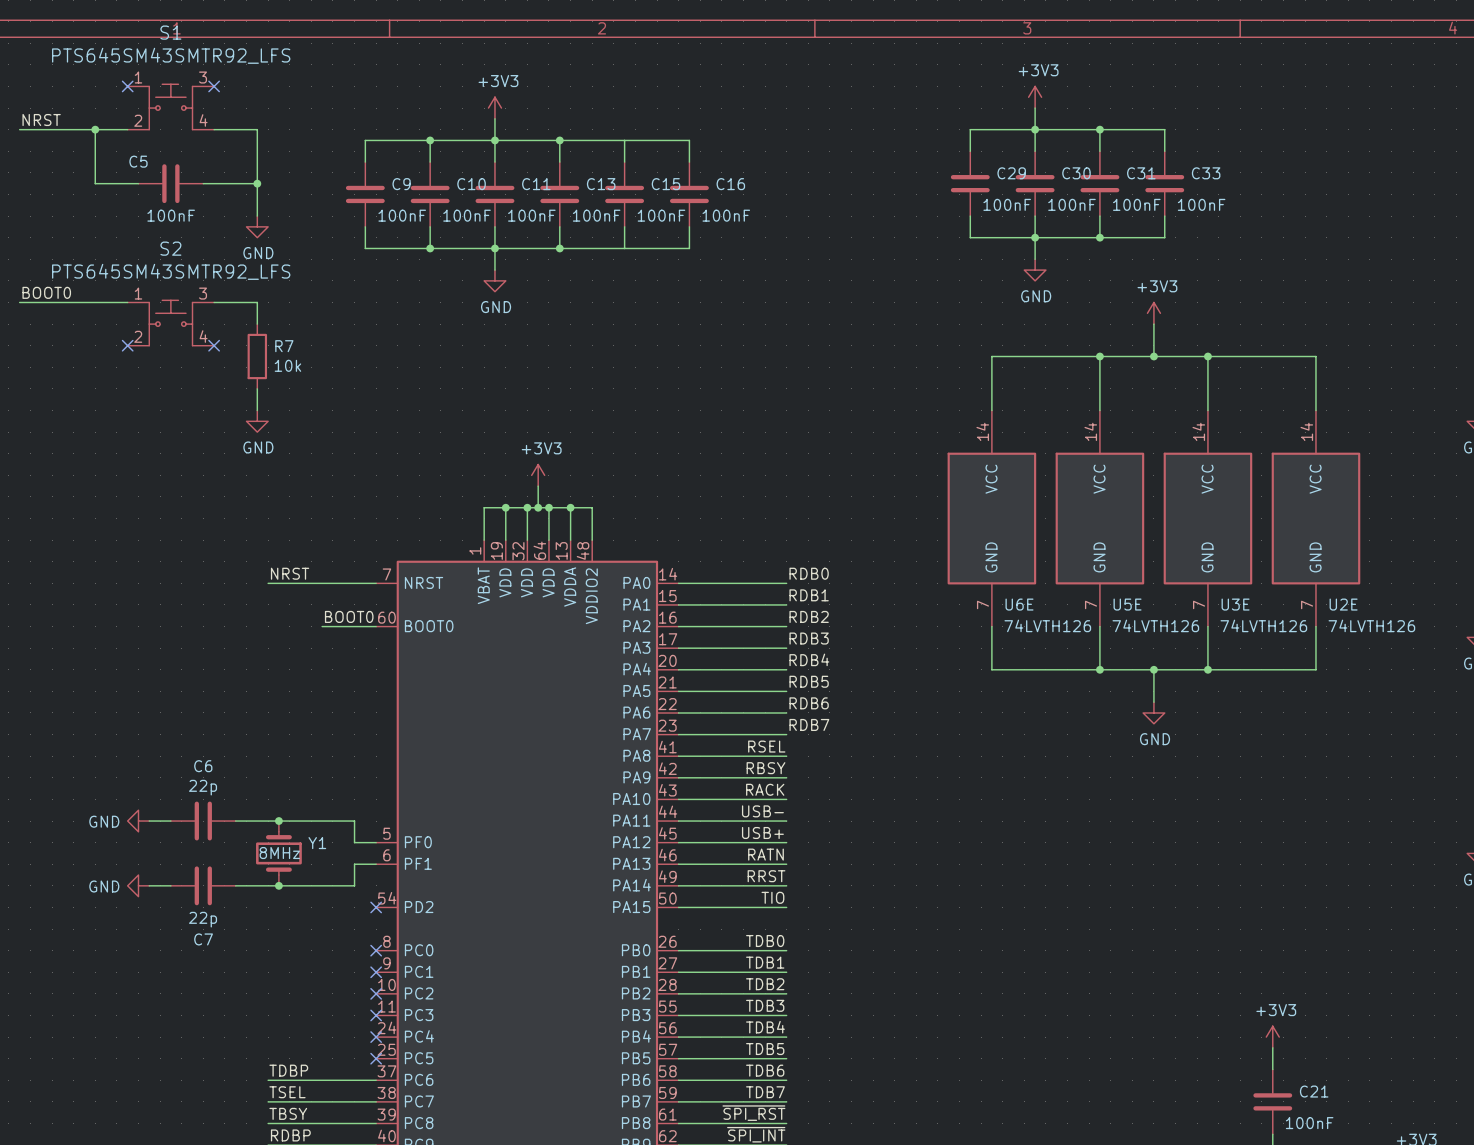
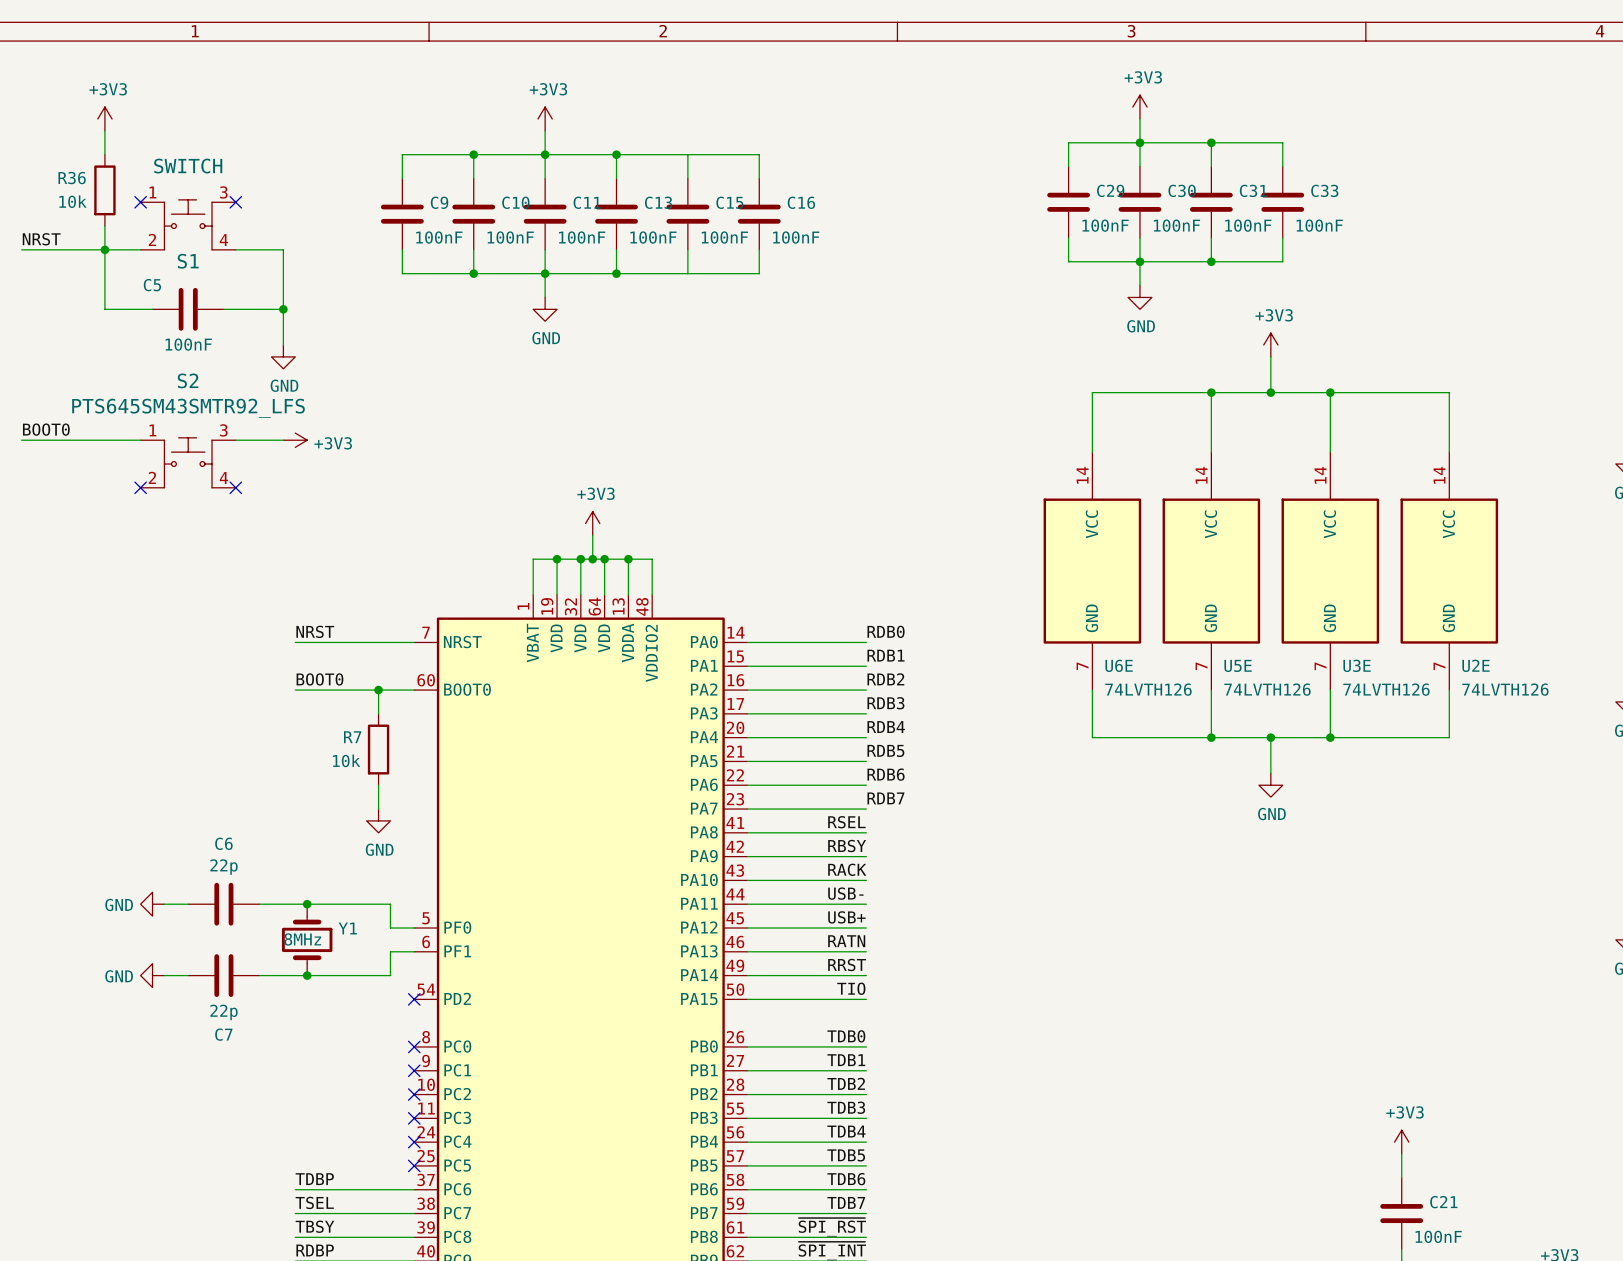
S1 name position: S1 (170, 32) -> S1 (188, 261)
S1 value: PTS645SM43SMTR92_LFS (171, 55) -> SWITCH (188, 166)
no-connect mark: (127, 86) -> none
no-connect mark: (214, 86) -> none
S1 position: (170, 106) -> (188, 224)
power symbol: none -> +3V3 (104, 118)
wire: none -> (104, 130) (104, 142)
label position: NRST (41, 120) -> NRST (41, 239)
wire: (19, 129) (127, 129) -> (21, 249) (140, 249)
junction: (95, 129) -> none
wire: (214, 129) (257, 129) (257, 216) -> none
wire: (95, 140) (95, 183) (138, 183) -> none
R36: none -> 10k (104, 190)
no-connect mark: none -> (140, 202)
C5 position: (170, 183) -> (188, 309)
wire: (203, 183) (257, 183) -> (223, 309) (283, 309)
no-connect mark: none -> (235, 202)
junction: (257, 183) -> none
wire: none -> (104, 226) (104, 309) (152, 309)
junction: none -> (104, 249)
power symbol: GND (257, 226) -> none
junction: none -> (283, 309)
label position: BOOT0 (46, 292) -> BOOT0 (46, 429)
wire: (19, 302) (127, 302) -> (21, 440) (140, 440)
wire: (214, 302) (257, 302) -> (235, 249) (283, 249) (283, 333)
S2 position: (170, 323) -> (188, 462)
power symbol: none -> GND (283, 356)
no-connect mark: (127, 345) -> none
no-connect mark: (214, 345) -> none
R7 name position: R7 (284, 346) -> R7 (352, 737)
R7 position: (257, 356) -> (378, 749)
R7 value position: 10k (287, 365) -> 10k (346, 760)
wire: (257, 388) (257, 410) -> none
wire: none -> (235, 440) (283, 440)
power symbol: none -> +3V3 (295, 440)
power symbol: GND (257, 421) -> none
no-connect mark: none -> (140, 487)
no-connect mark: none -> (235, 487)
label position: BOOT0 (349, 616) -> BOOT0 (319, 679)
wire: none -> (295, 690) (354, 690)
wire: none -> (378, 690) (378, 713)
junction: none -> (378, 690)
wire: none -> (378, 785) (378, 809)
power symbol: none -> GND (378, 820)

